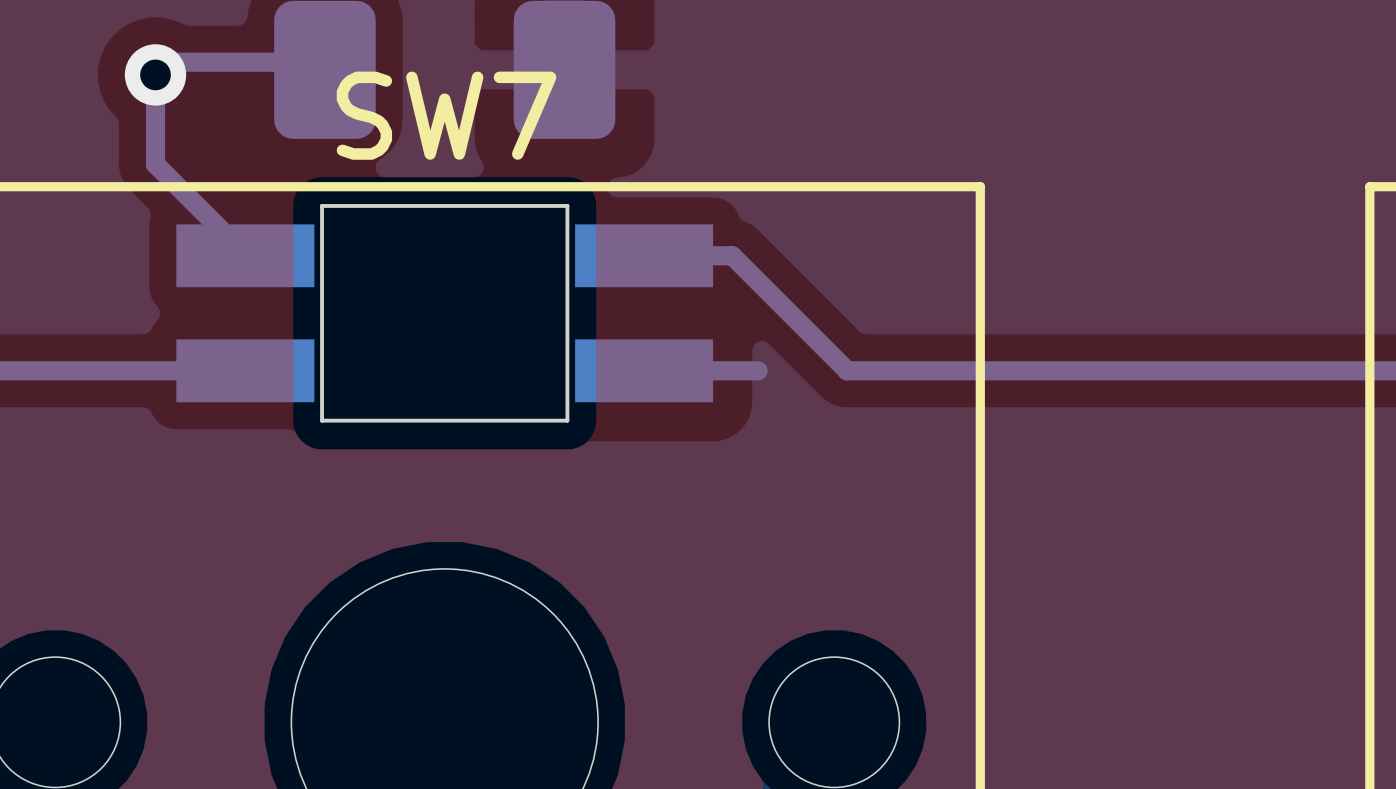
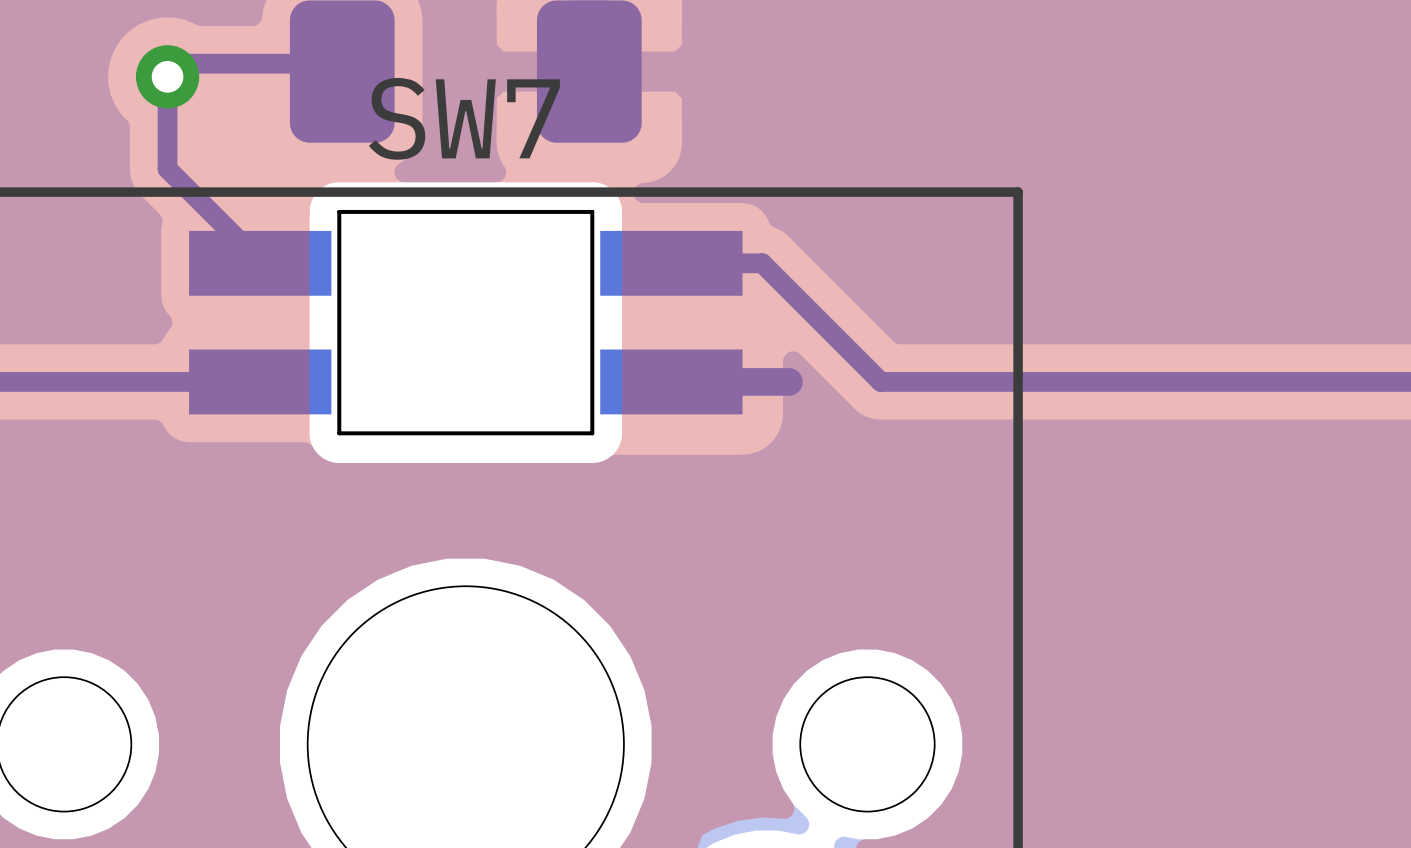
bottom track width: thin (644, 370) (758, 370) -> thick (671, 381) (788, 381)

